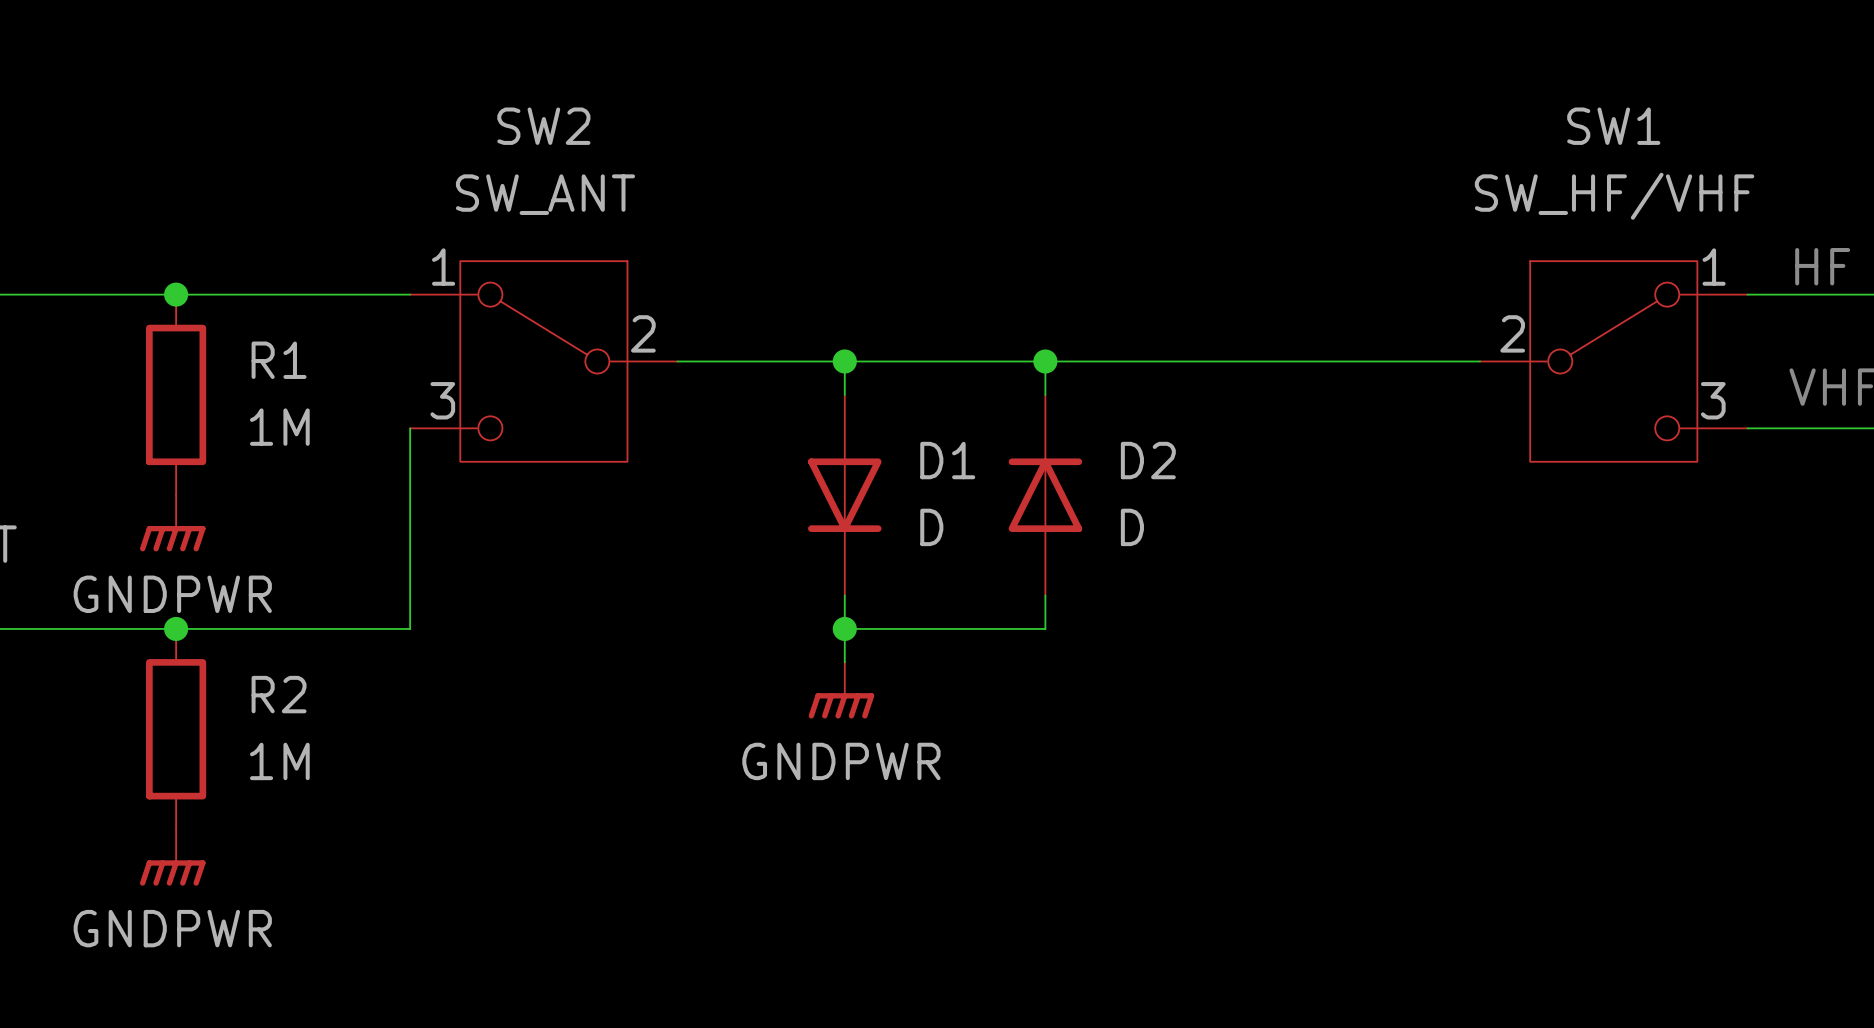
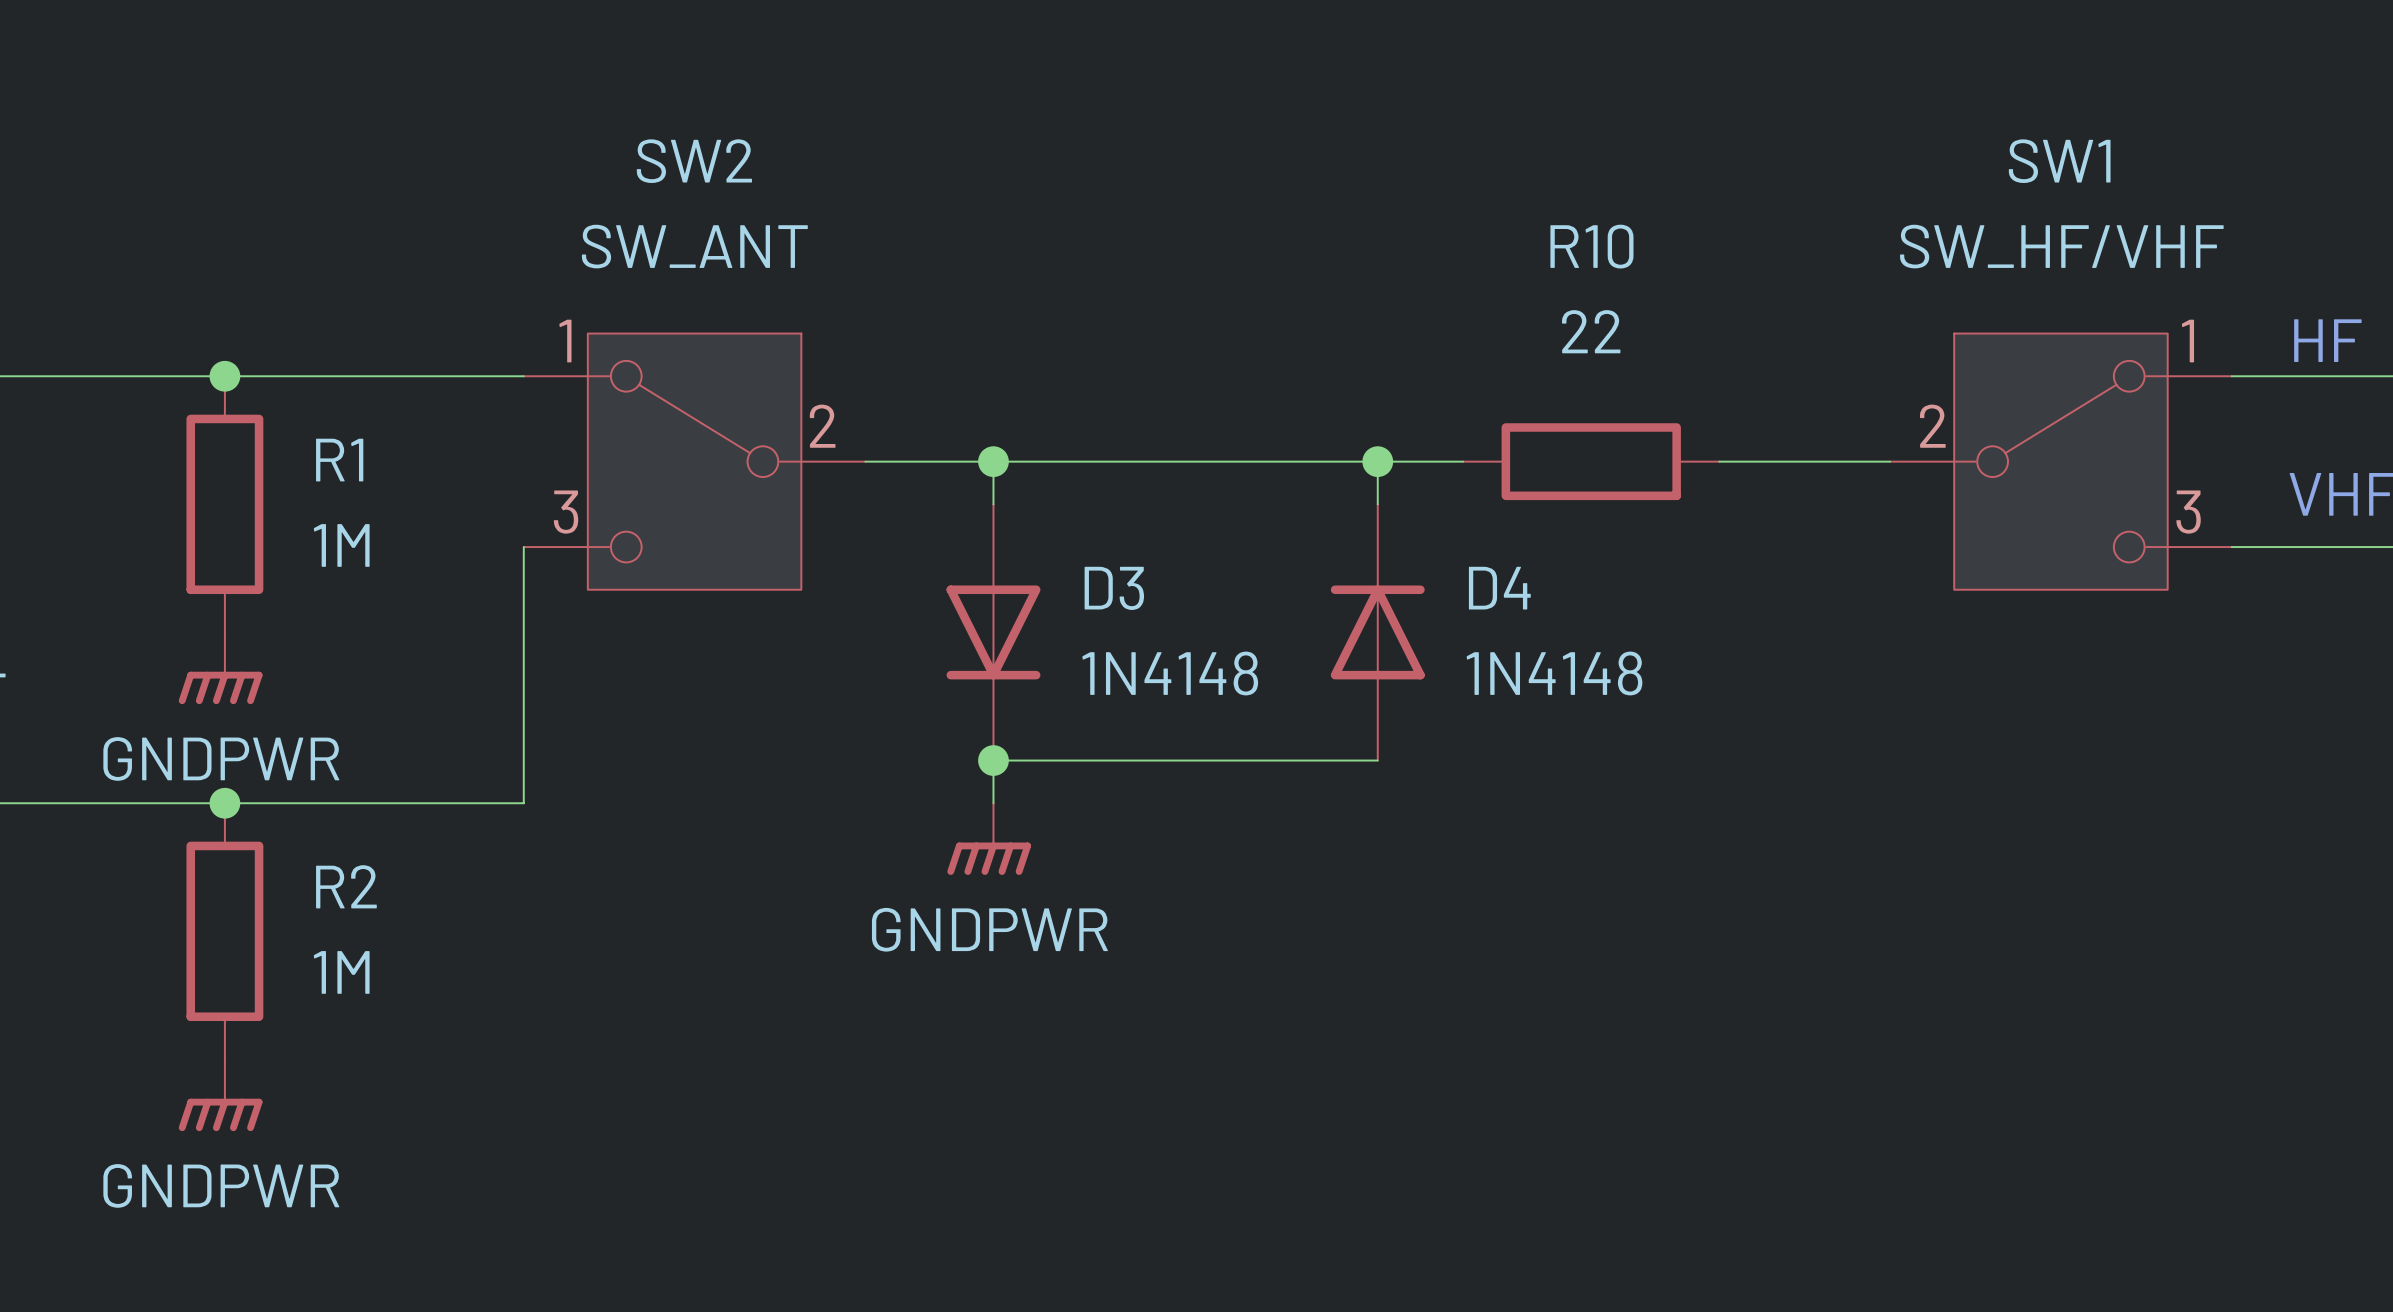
wire: (844, 361) (844, 394) -> (993, 461) (993, 504)
junction position: (844, 361) -> (993, 461)
wire: (1045, 361) (1045, 394) -> (1377, 461) (1377, 504)
junction position: (1045, 361) -> (1377, 461)
wire: (1145, 361) (1346, 361) -> none
R10: none -> 22 (1591, 461)
D3: none -> 1N4148 (993, 632)
D1: D (844, 495) -> none
D2: D (1045, 495) -> none
D4: none -> 1N4148 (1377, 632)
wire: (844, 595) (844, 662) -> none
wire: (1045, 595) (1045, 628) (844, 628) -> none
wire: none -> (1377, 760) (993, 760) (993, 803)
junction position: (844, 628) -> (993, 760)
power symbol position: GNDPWR (841, 690) -> GNDPWR (989, 839)

